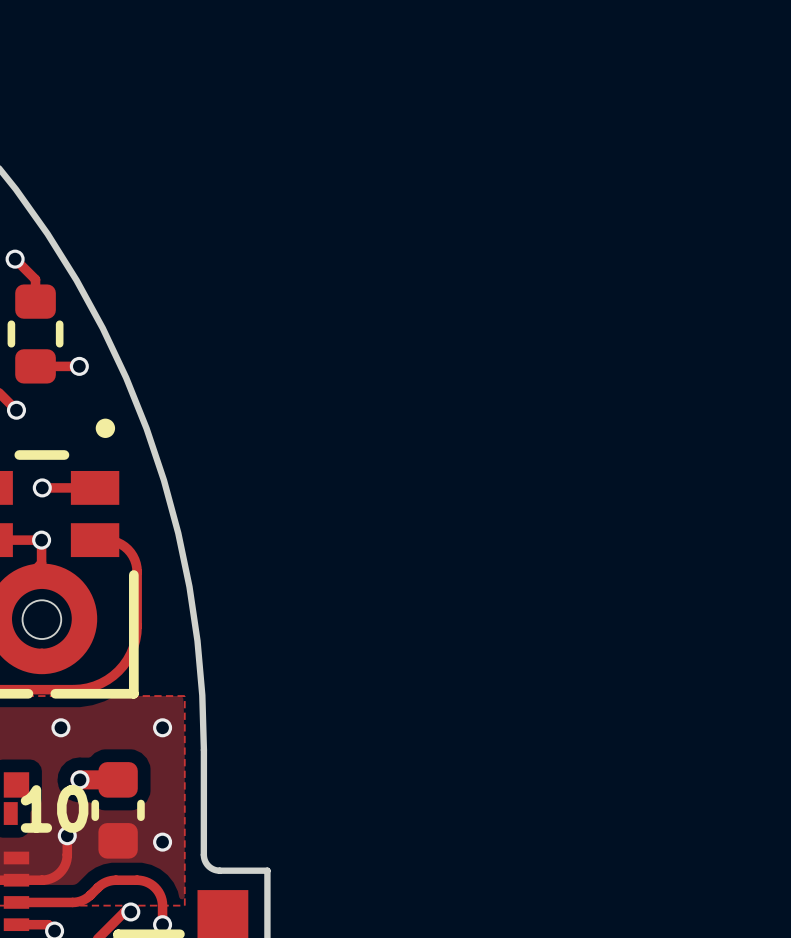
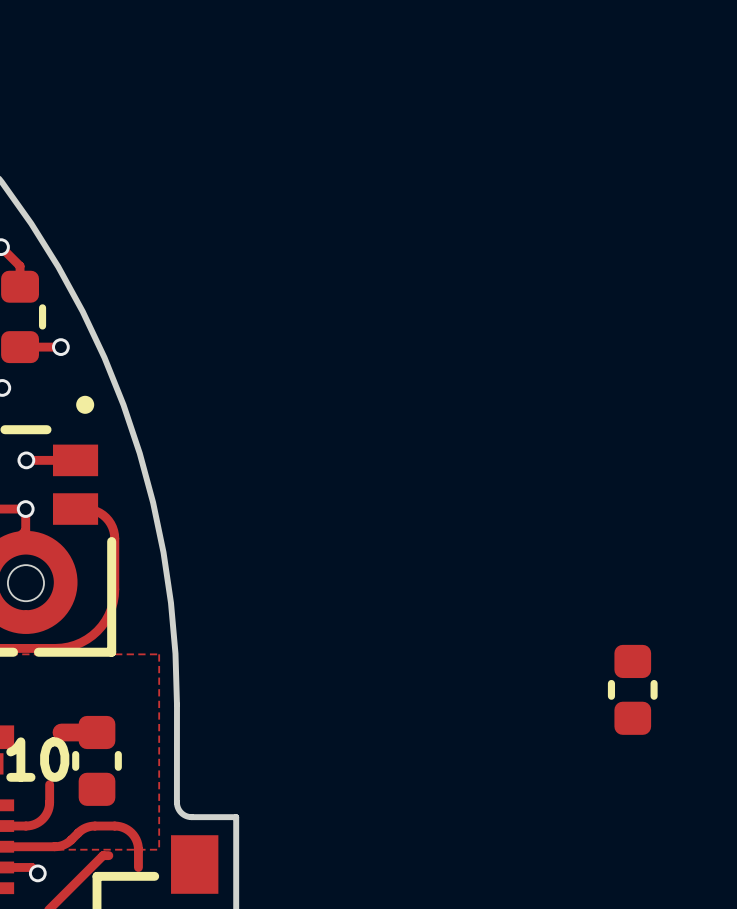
via: (60, 727) -> none
via: (162, 727) -> none
part: none -> (632, 689)
via: (79, 779) -> none
via: (67, 835) -> none
via: (162, 842) -> none
via: (130, 911) -> none
via: (162, 924) -> none

